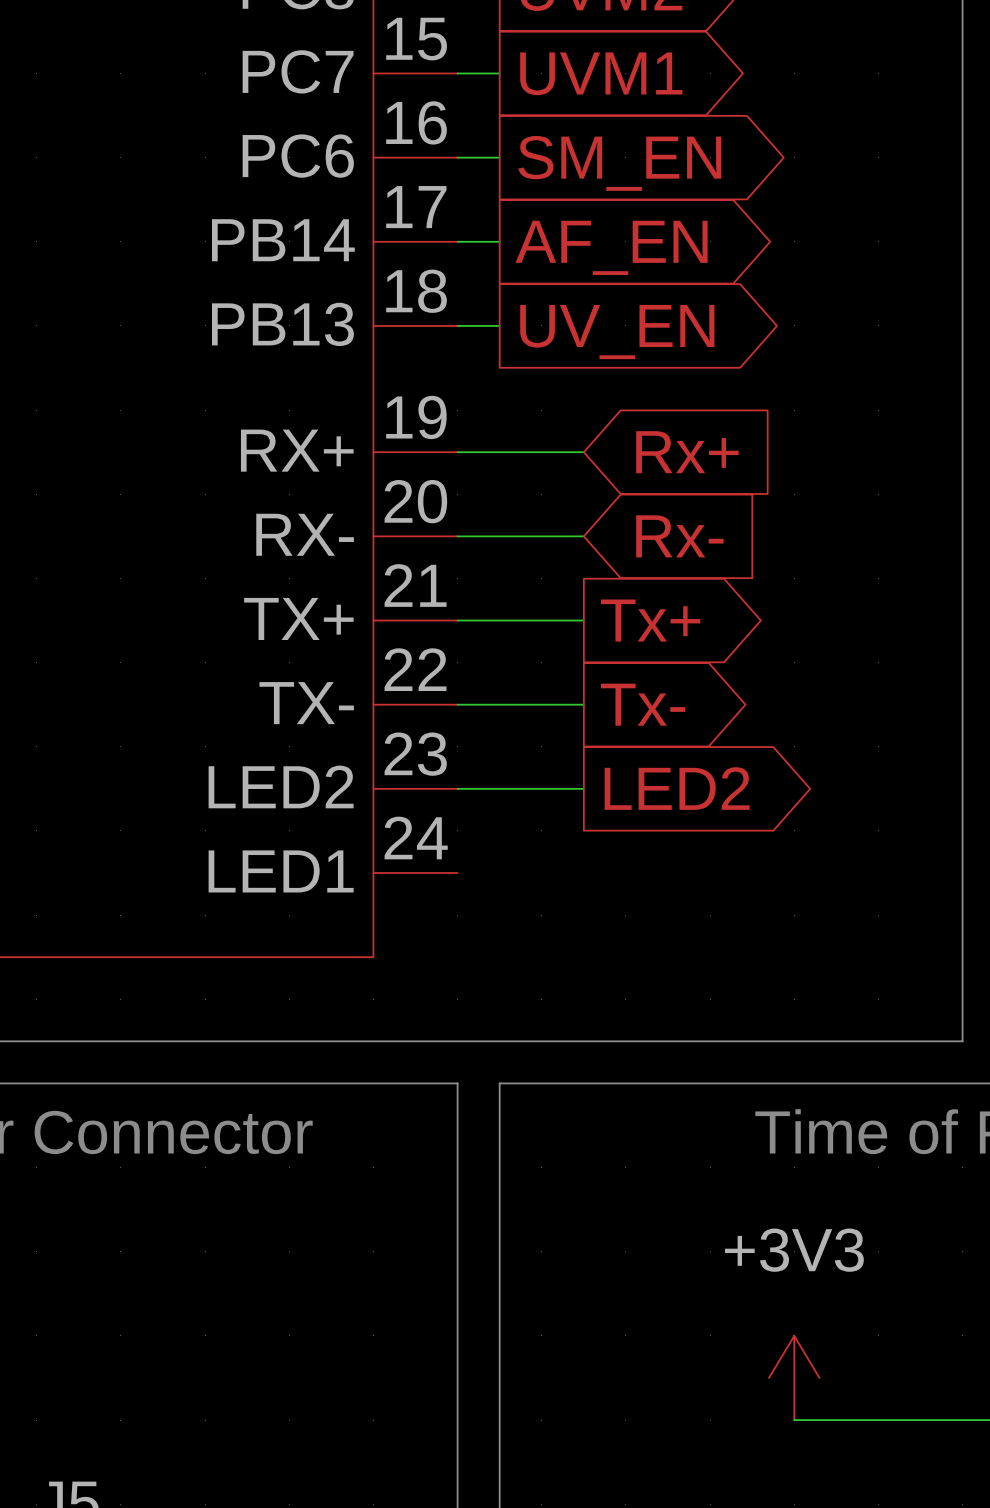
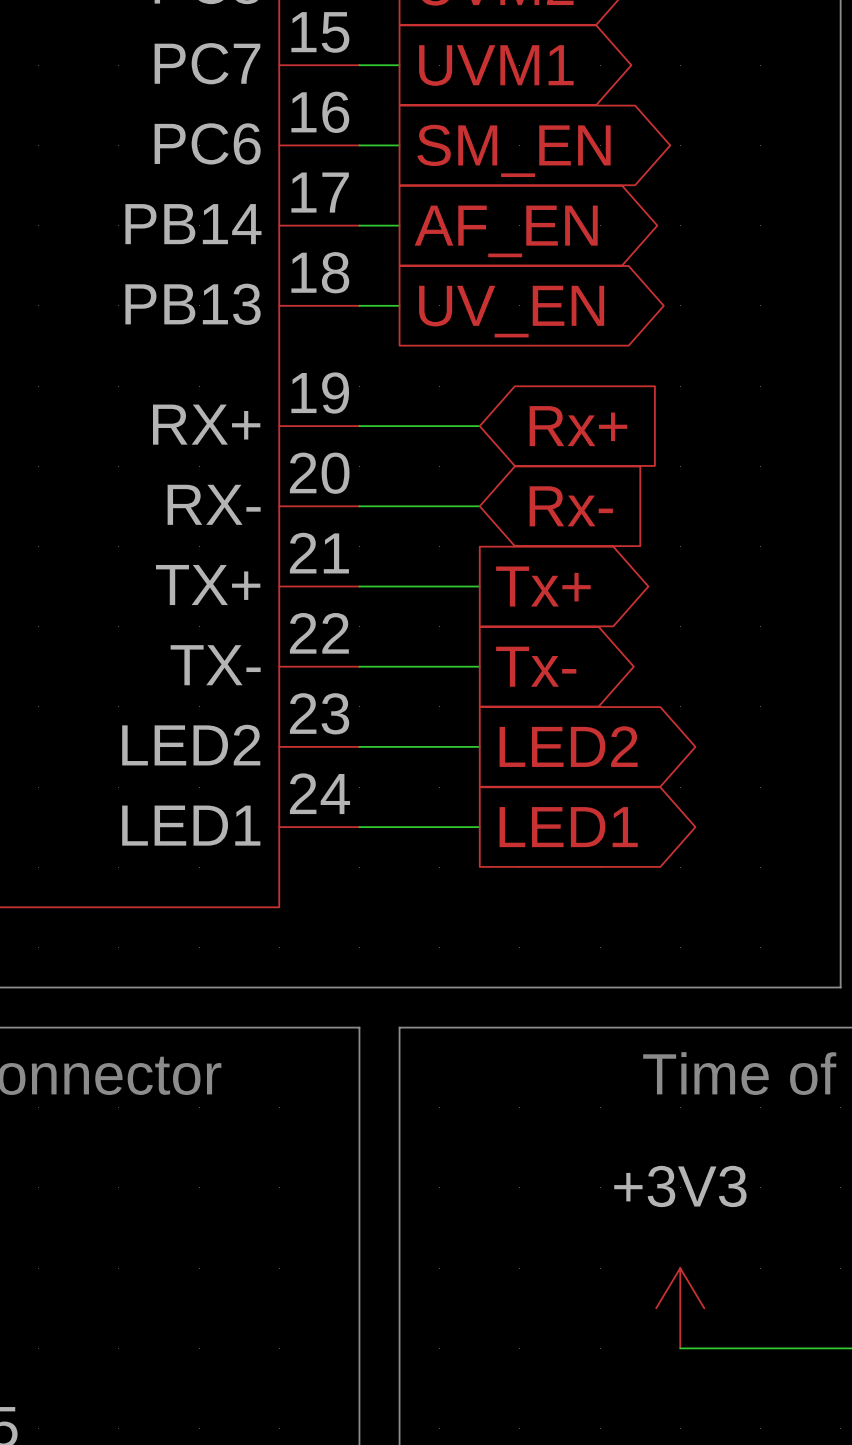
wire: none -> (359, 827) (479, 827)
global label: none -> LED1 (568, 827)

